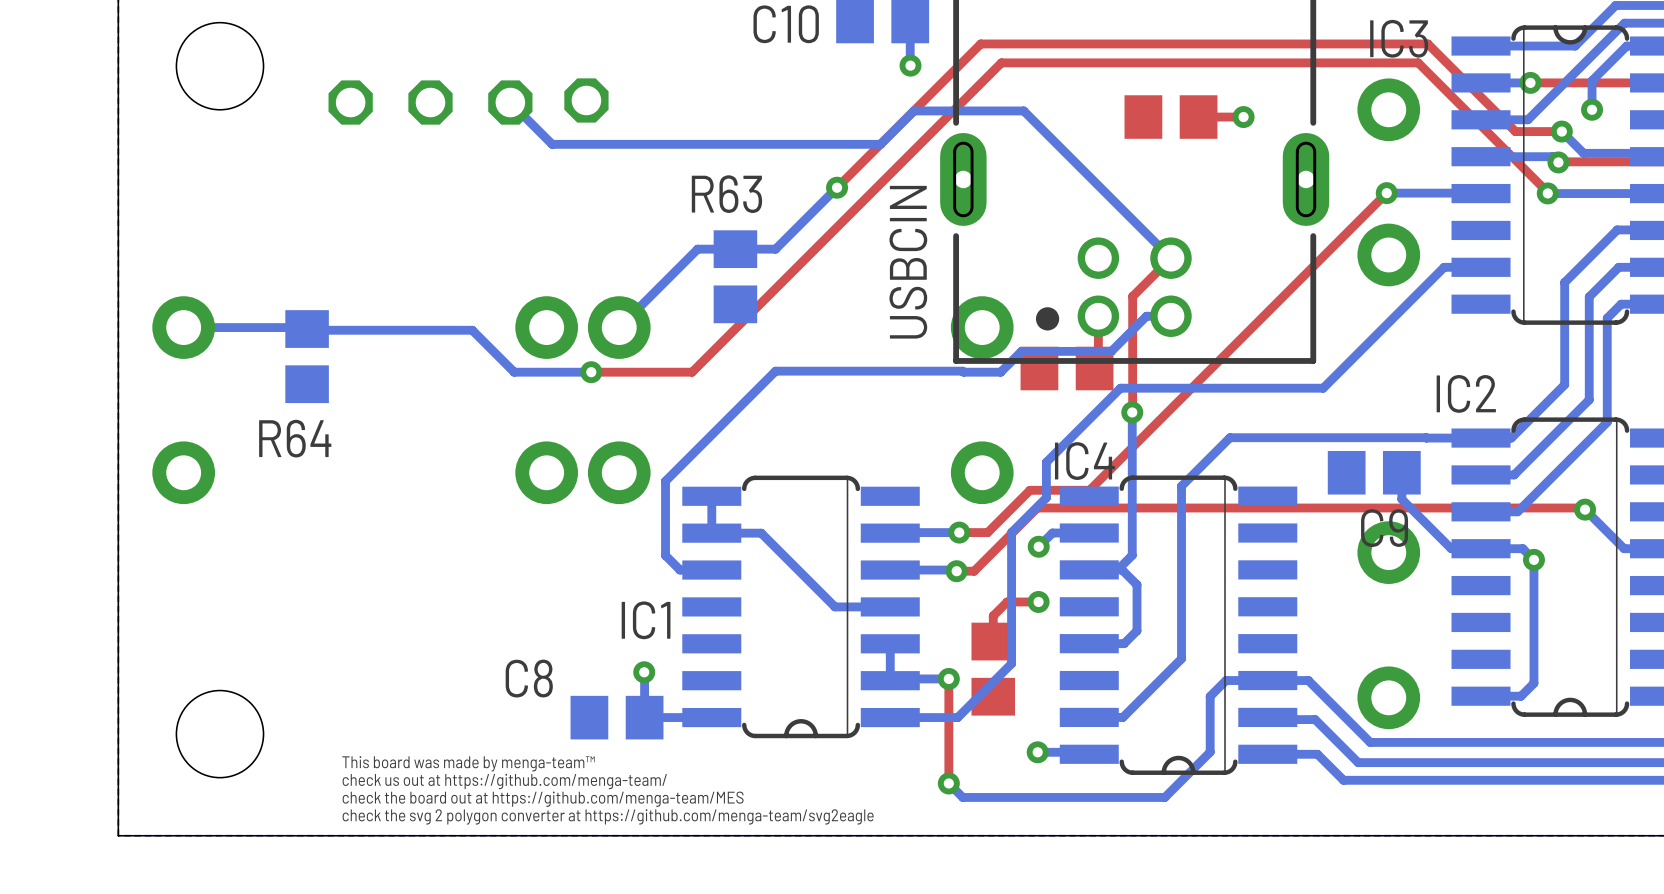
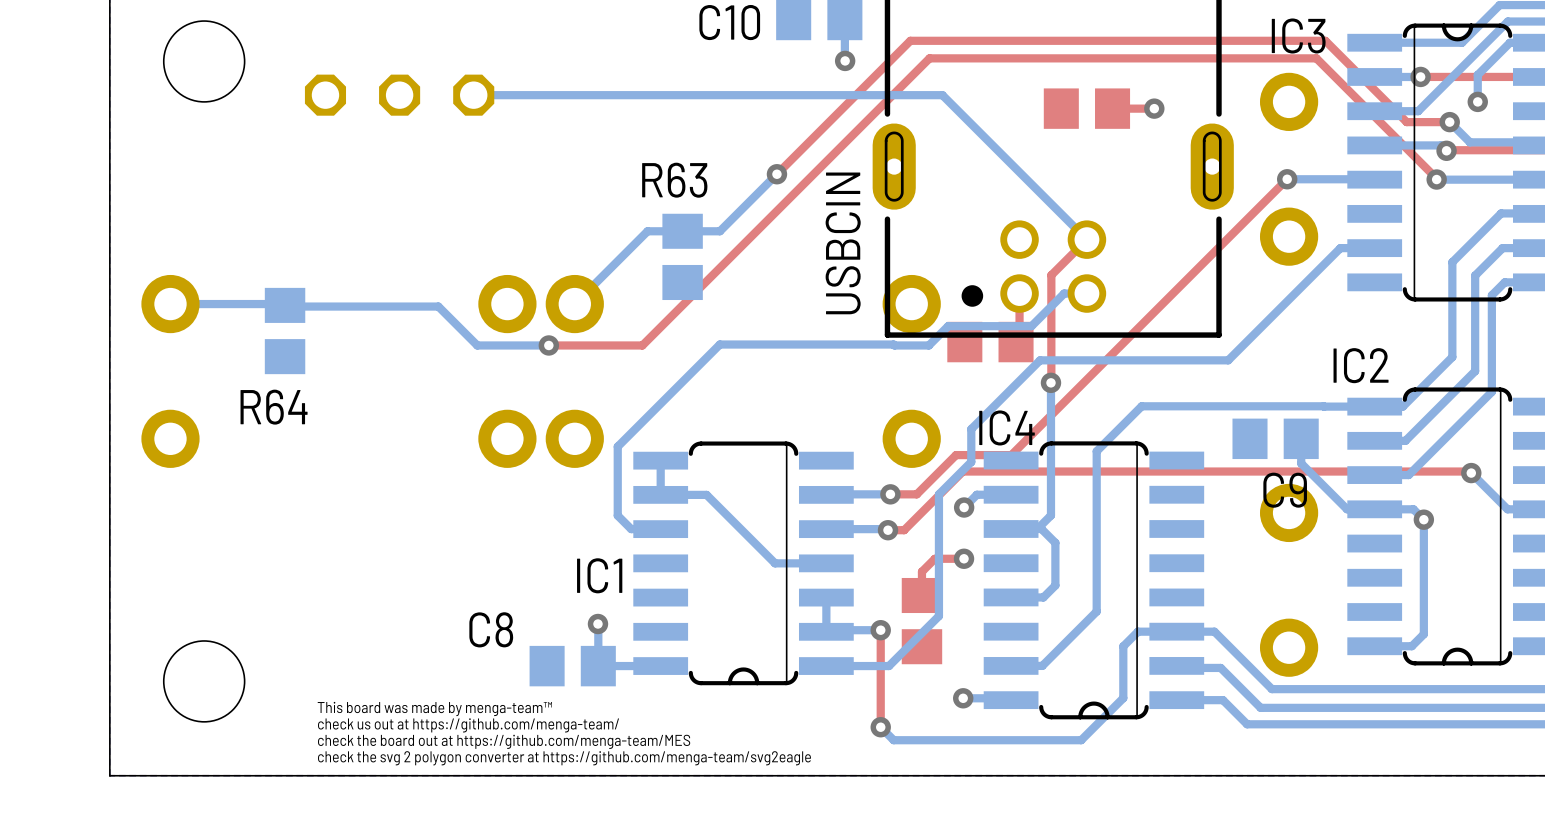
part: (586, 100) -> none
bottom track: (510, 102) (552, 144) (880, 144) (913, 110) (1023, 110) -> (473, 95) (942, 95) (950, 102)

